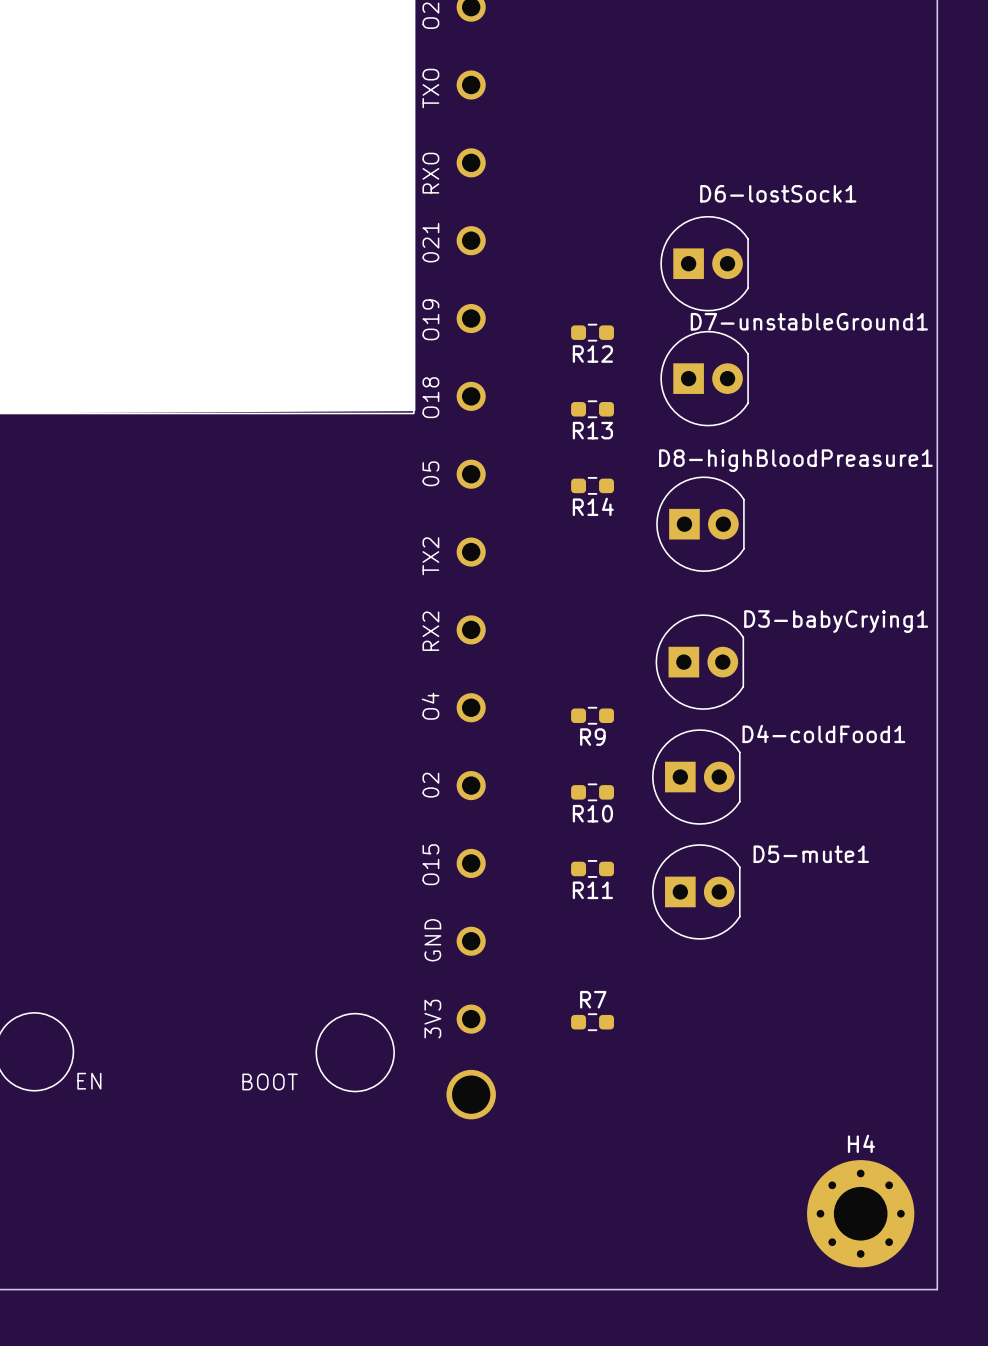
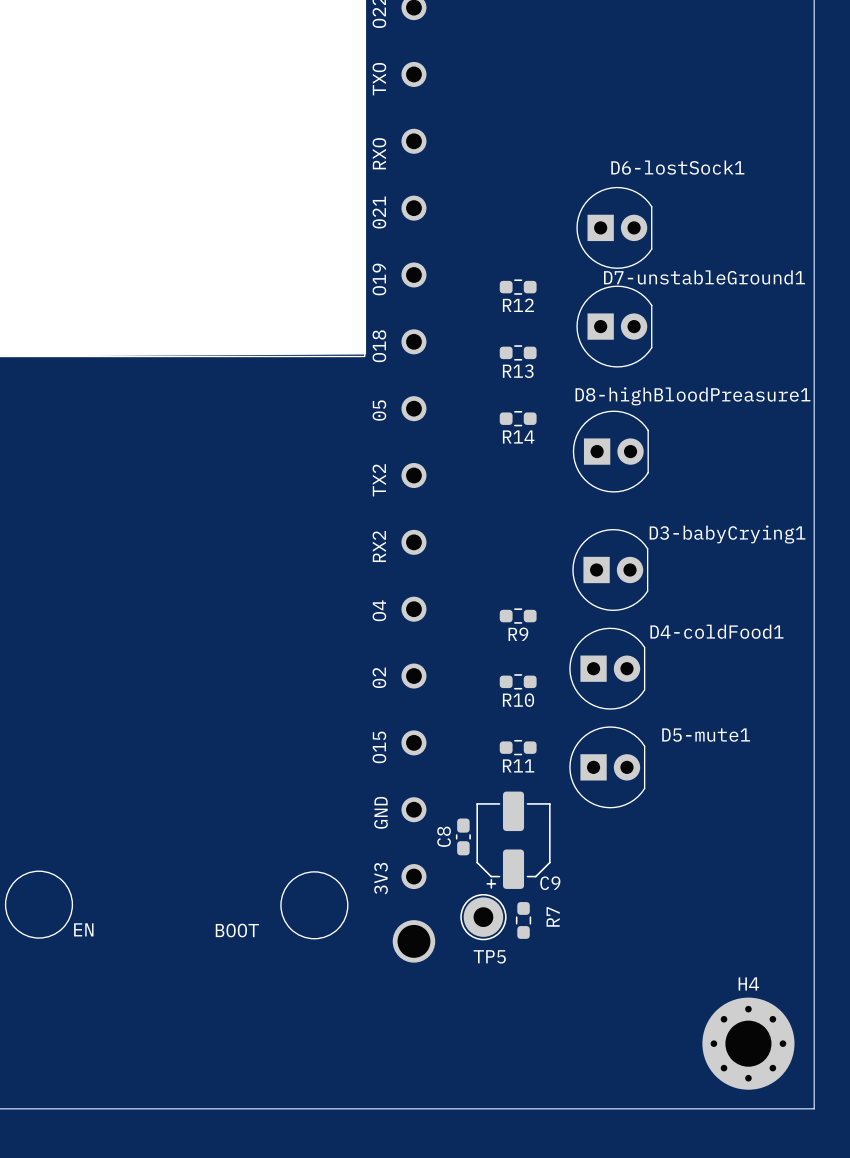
C8: none -> (463, 836)
C9: none -> (513, 840)
R7 rotation: 0° (592, 1022) -> 90° clockwise (523, 920)
R7 position: (592, 1022) -> (523, 920)
TP5: none -> (483, 917)

